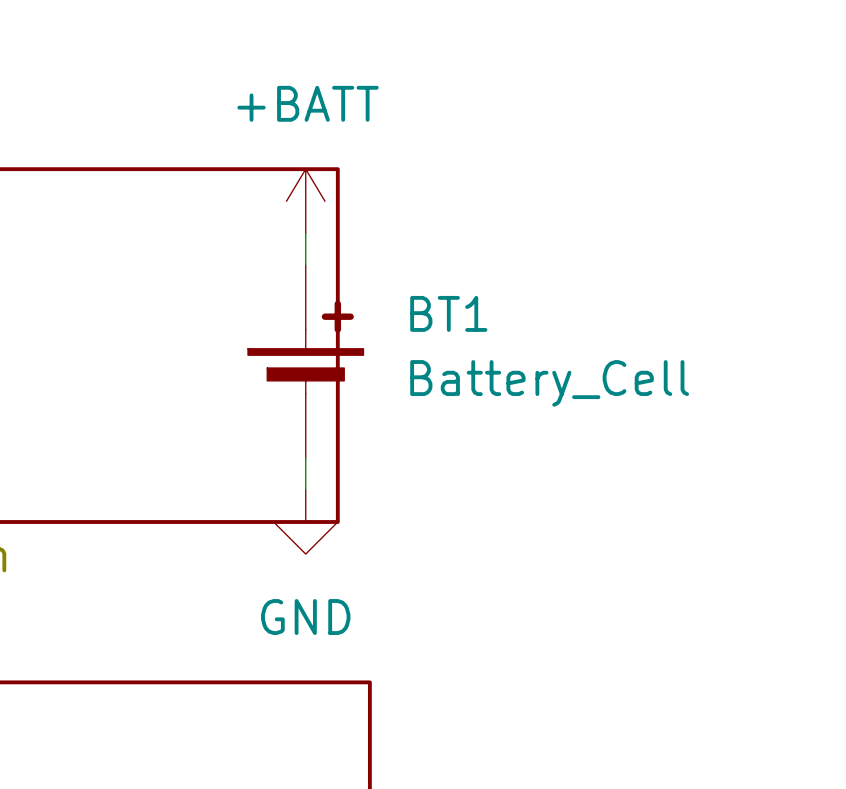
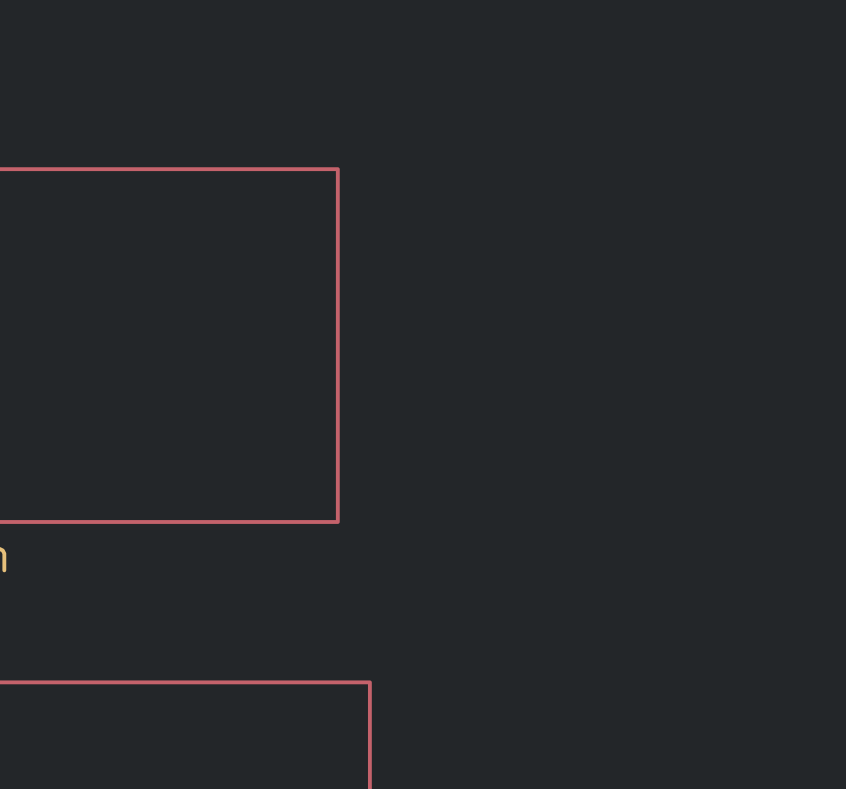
power symbol: +BATT (305, 201) -> none
wire: (305, 233) (305, 265) -> none
BT1: Battery_Cell (305, 361) -> none
wire: (305, 457) (305, 489) -> none
power symbol: GND (305, 521) -> none

